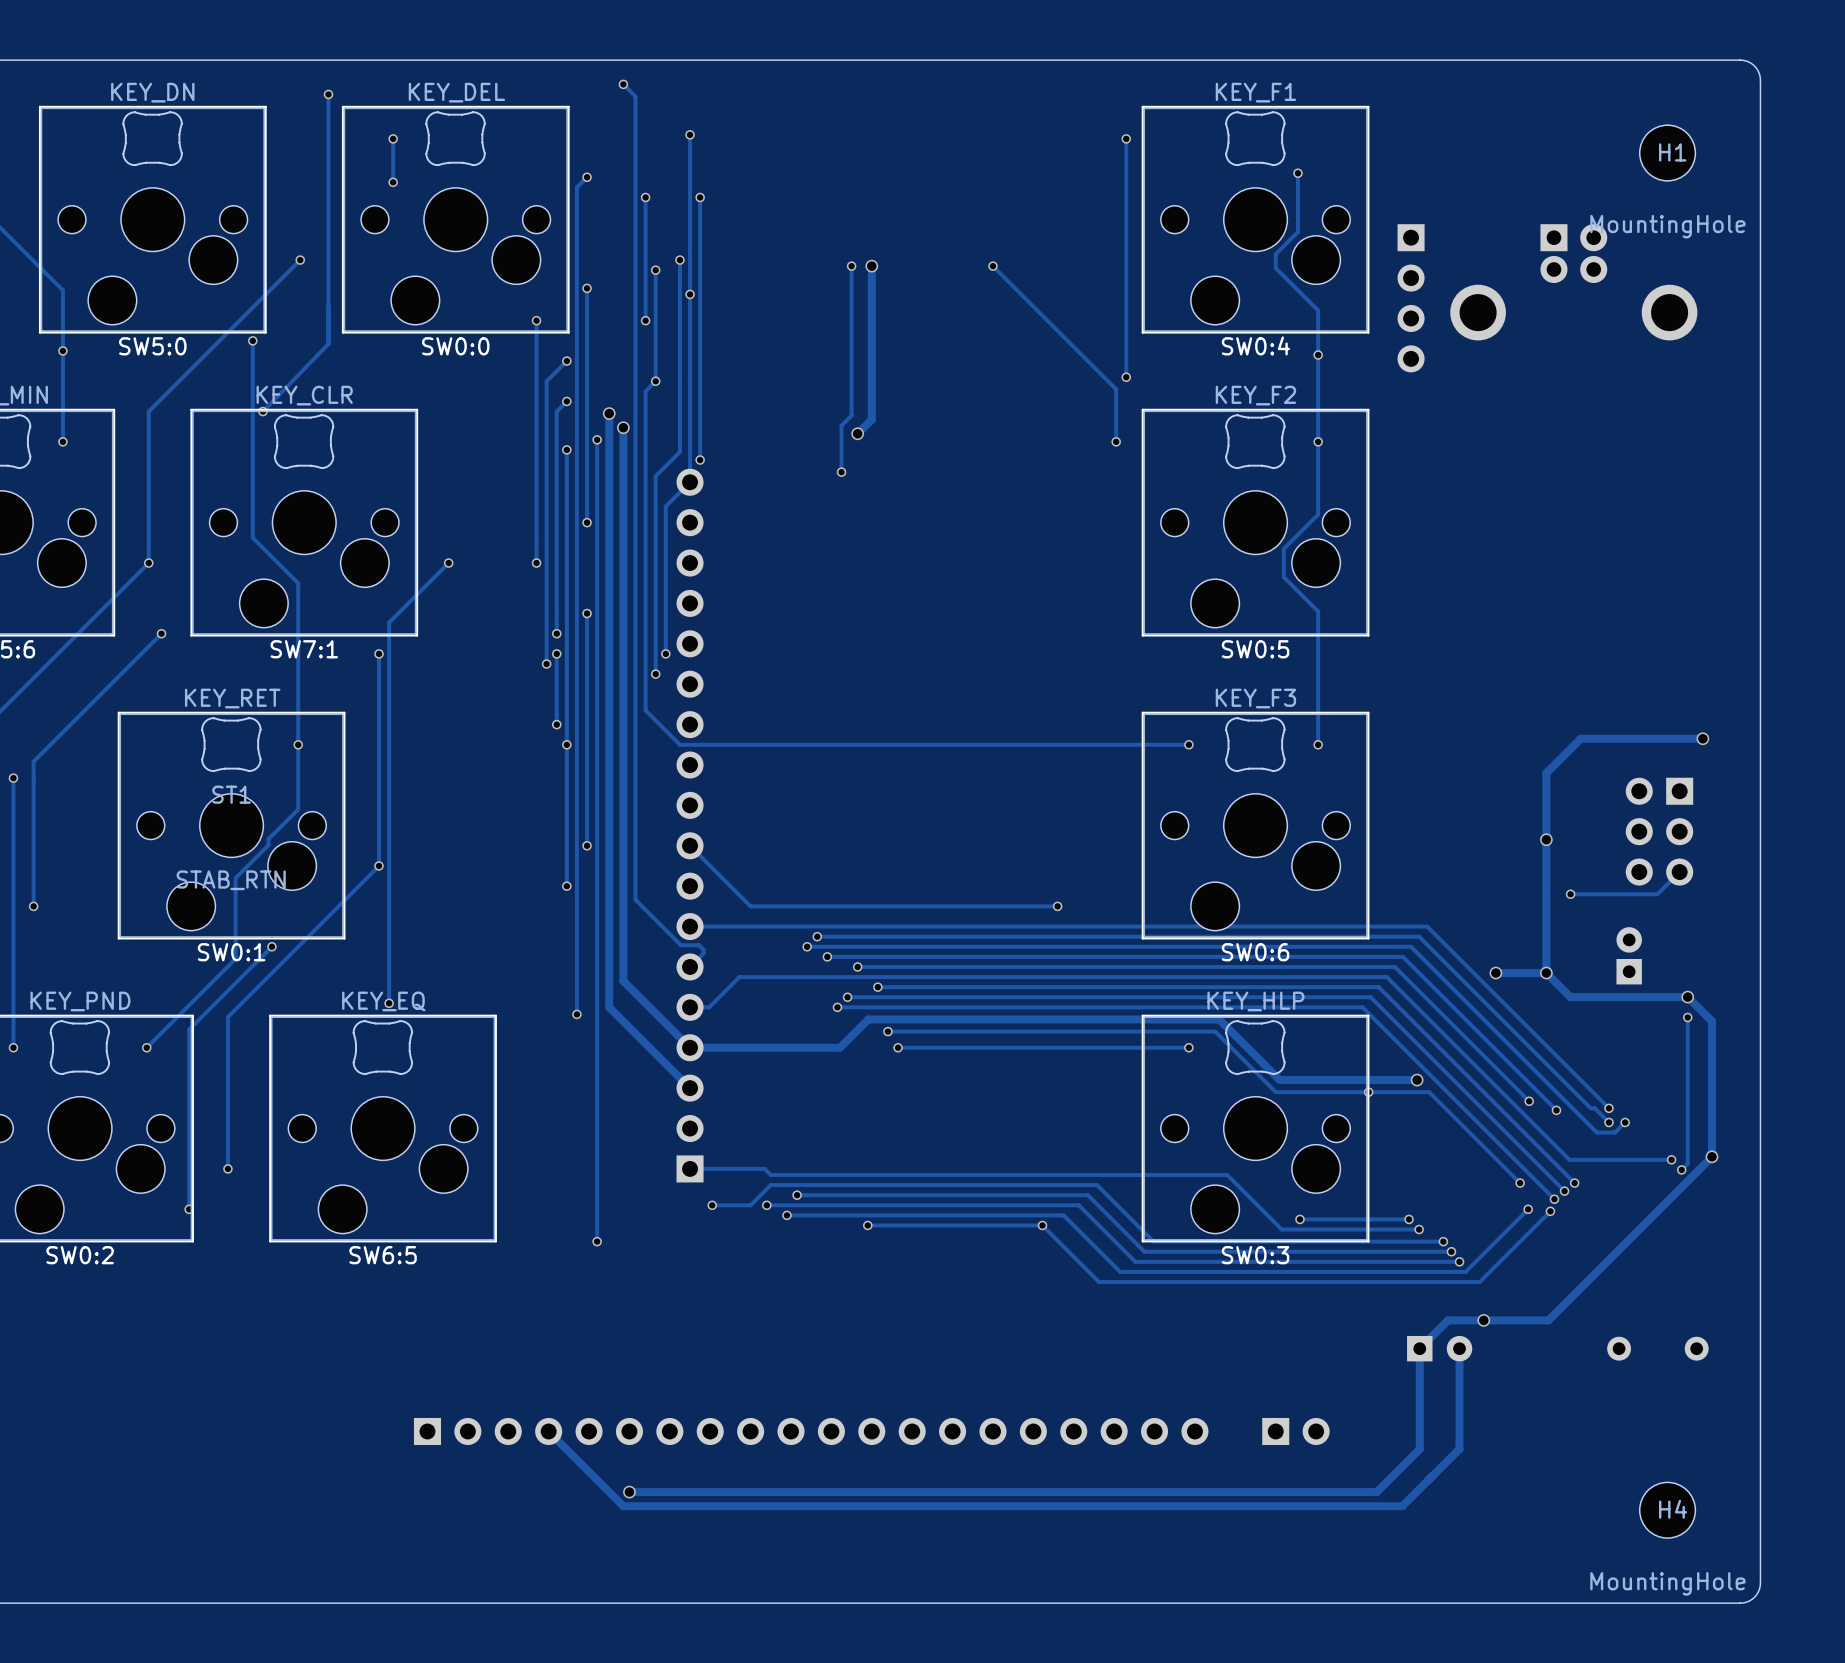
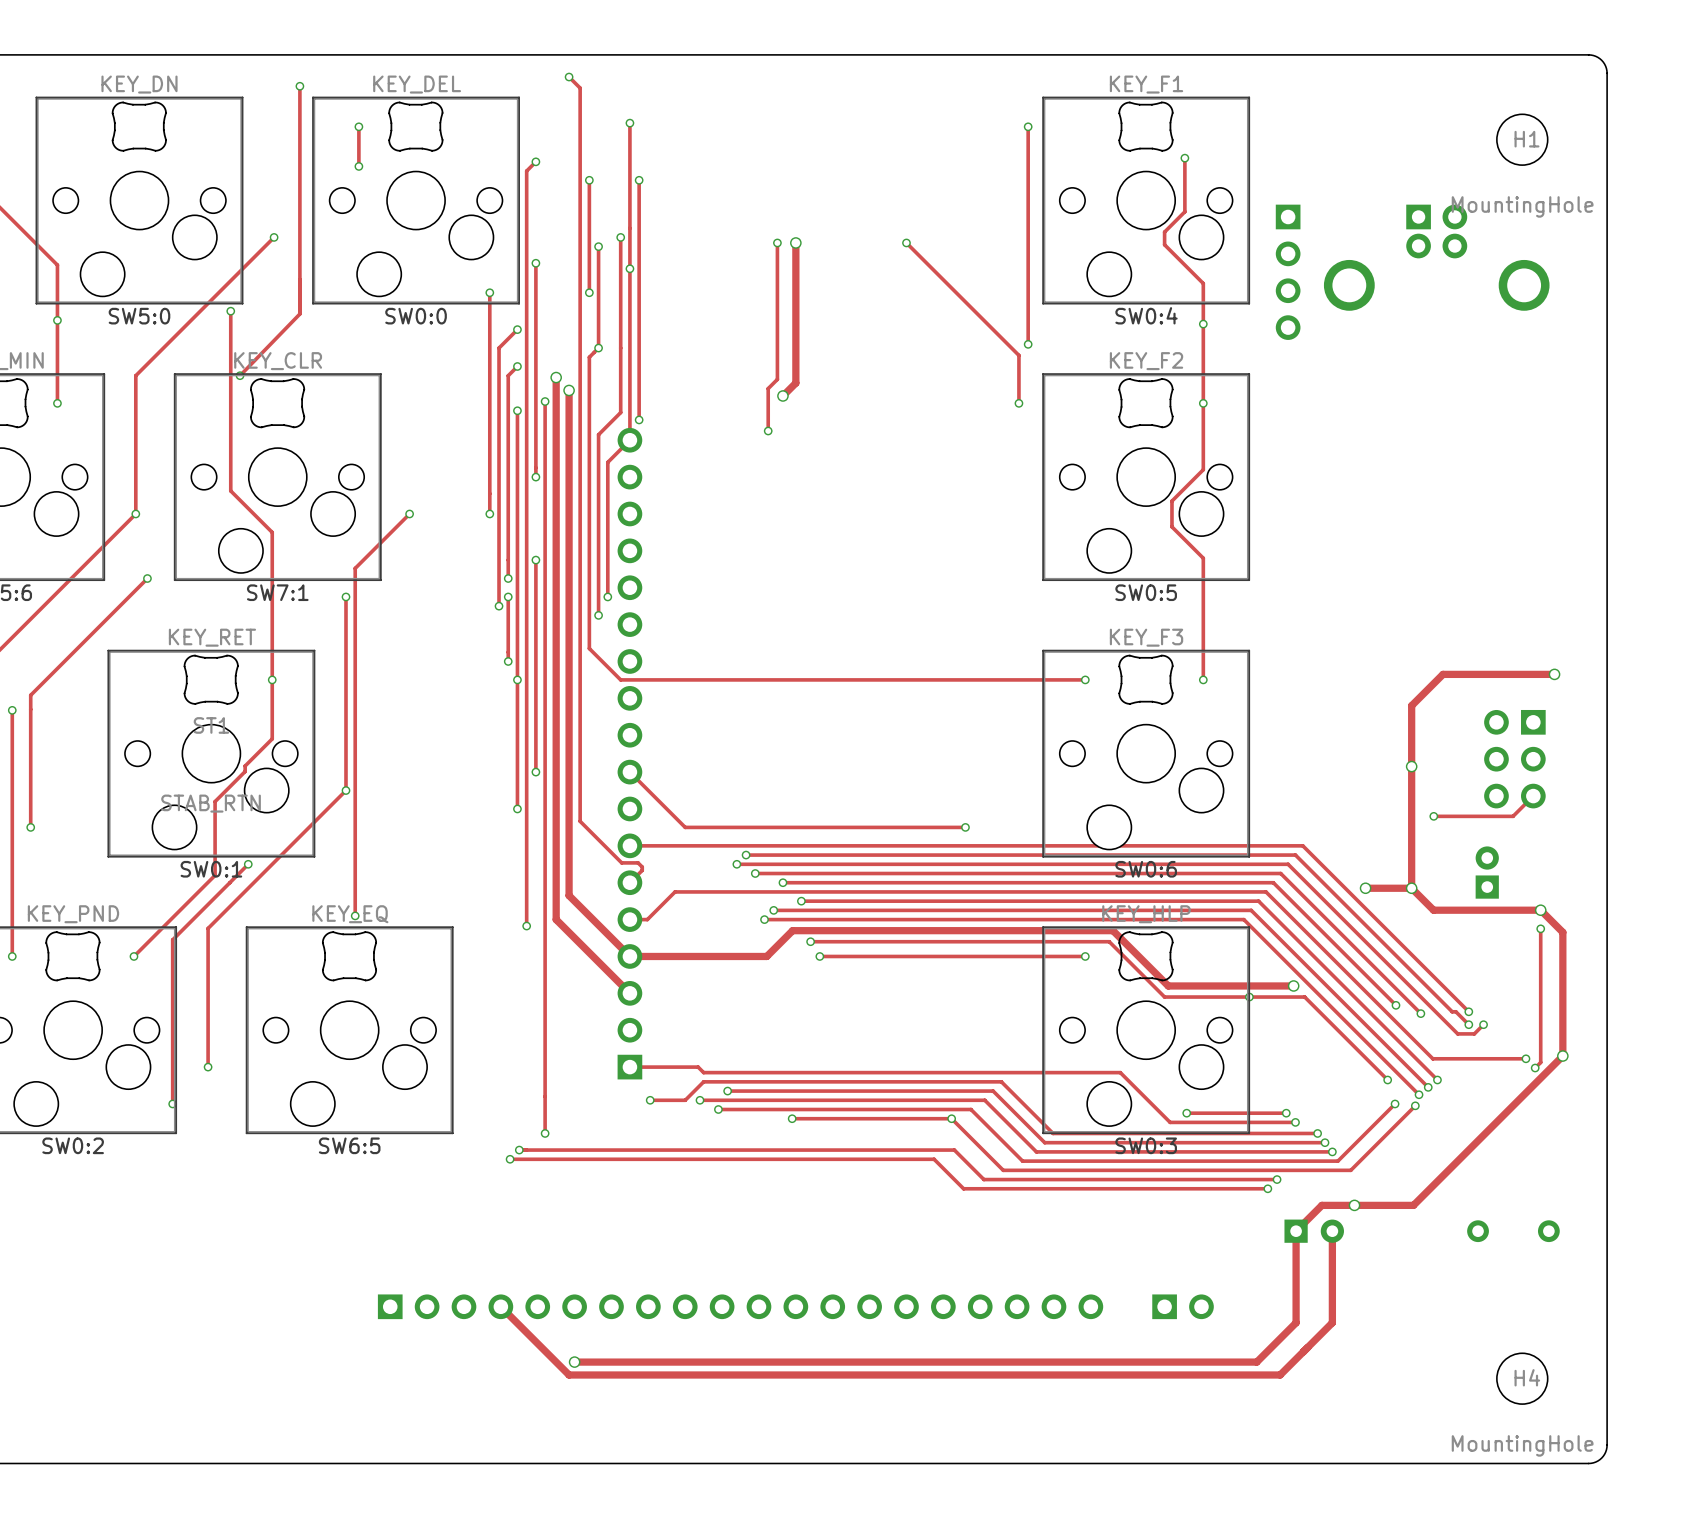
track: none -> (519, 1150) (954, 1150) (983, 1179) (1277, 1179)
via: none -> (519, 1150)
track: none -> (510, 1159) (934, 1159) (963, 1188) (1267, 1188)
via: none -> (510, 1159)
via: none -> (1277, 1179)
via: none -> (1267, 1188)

